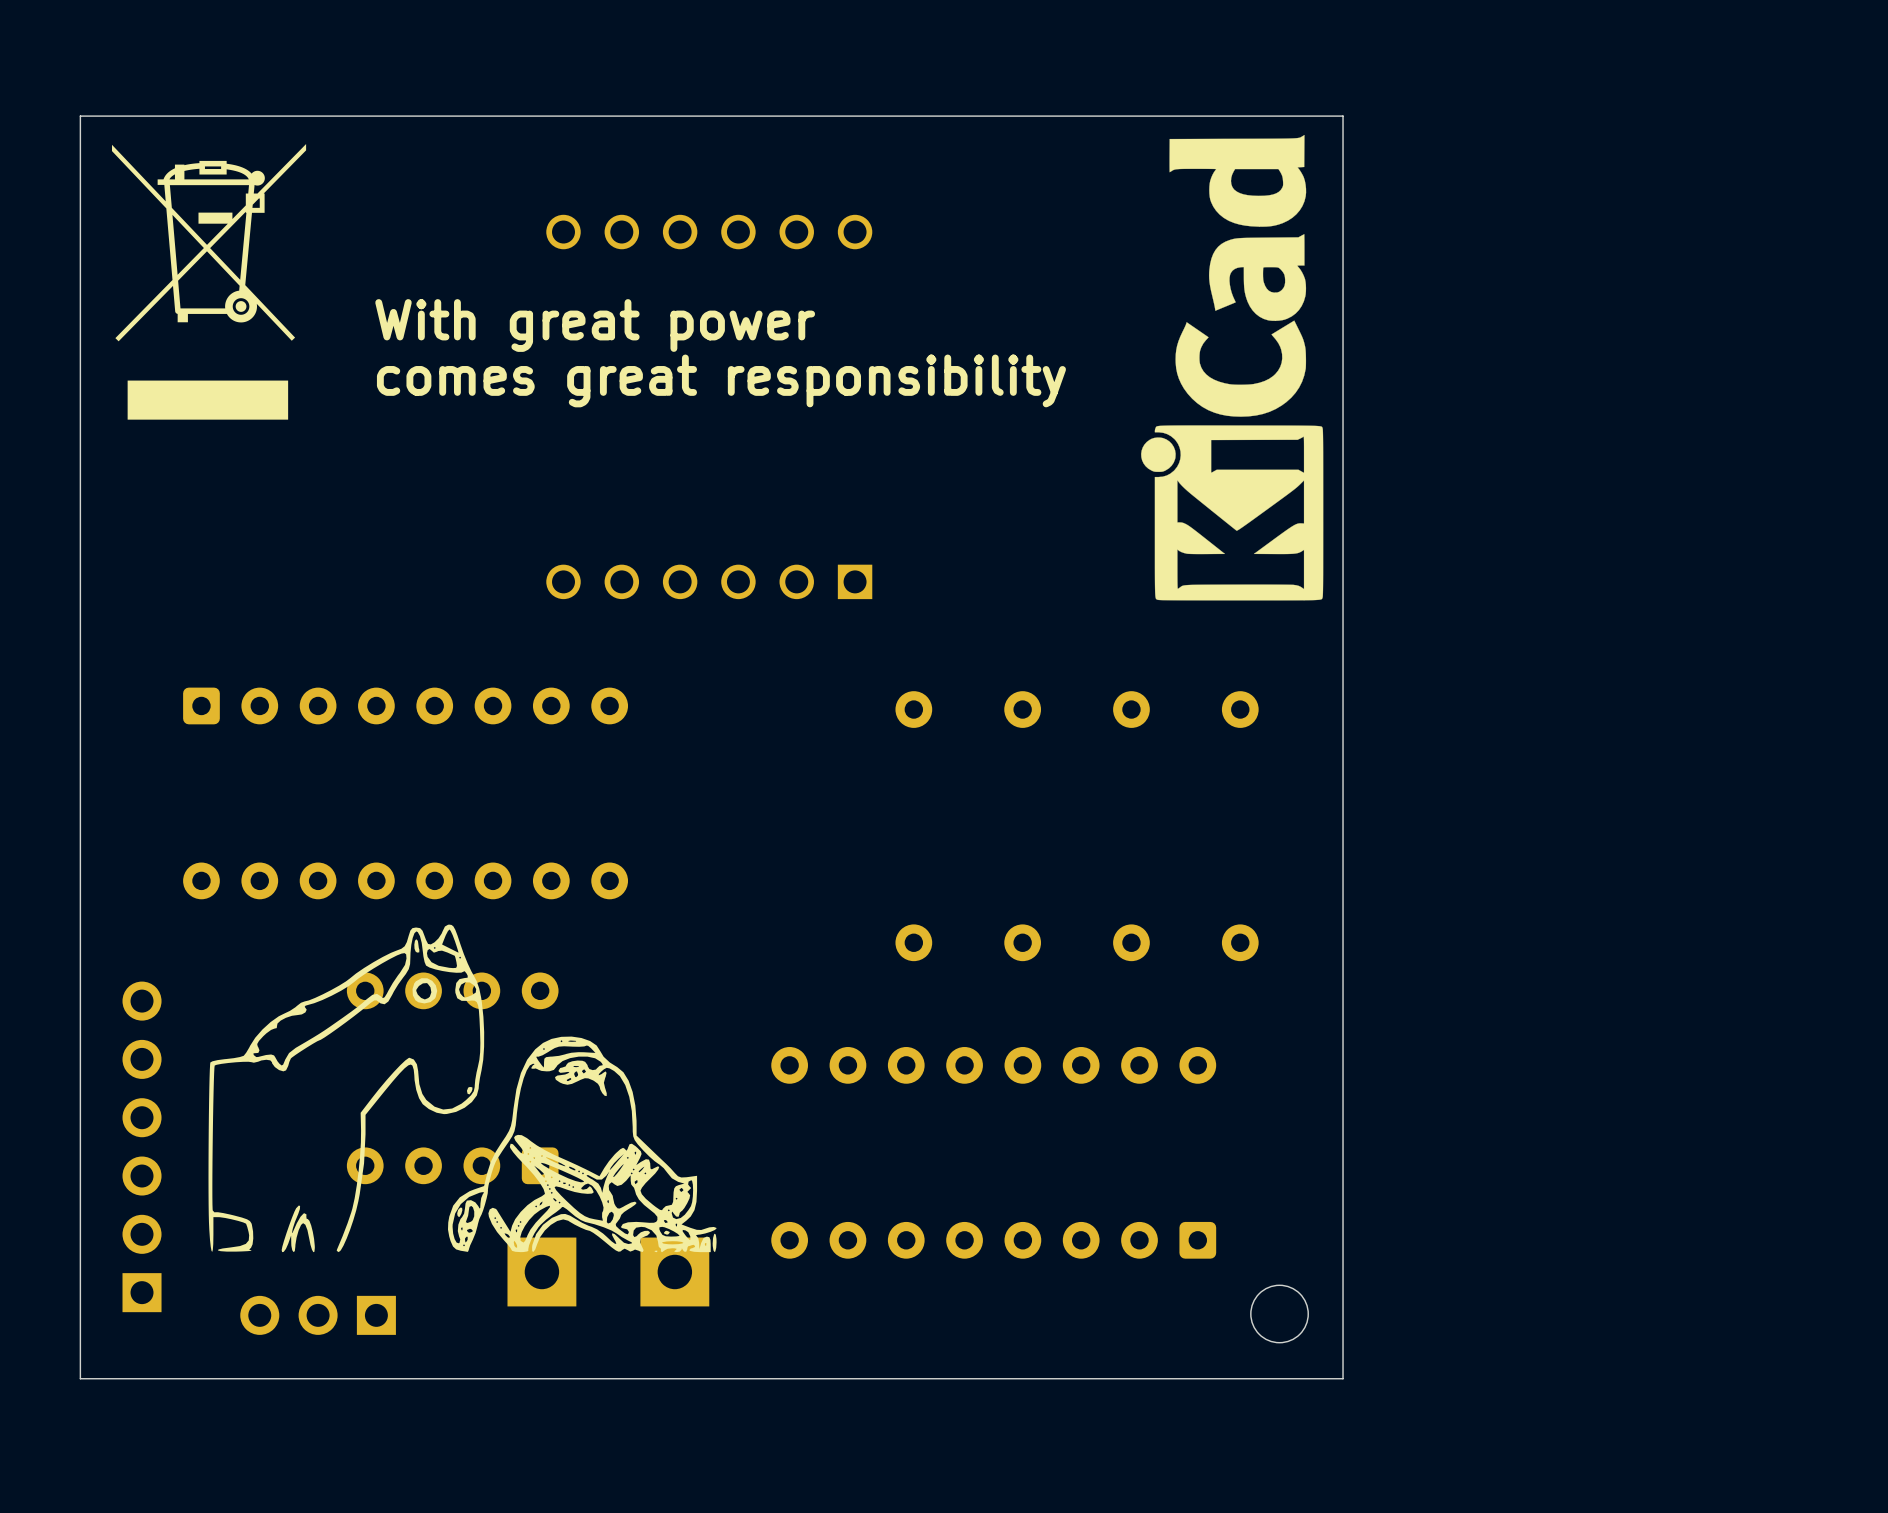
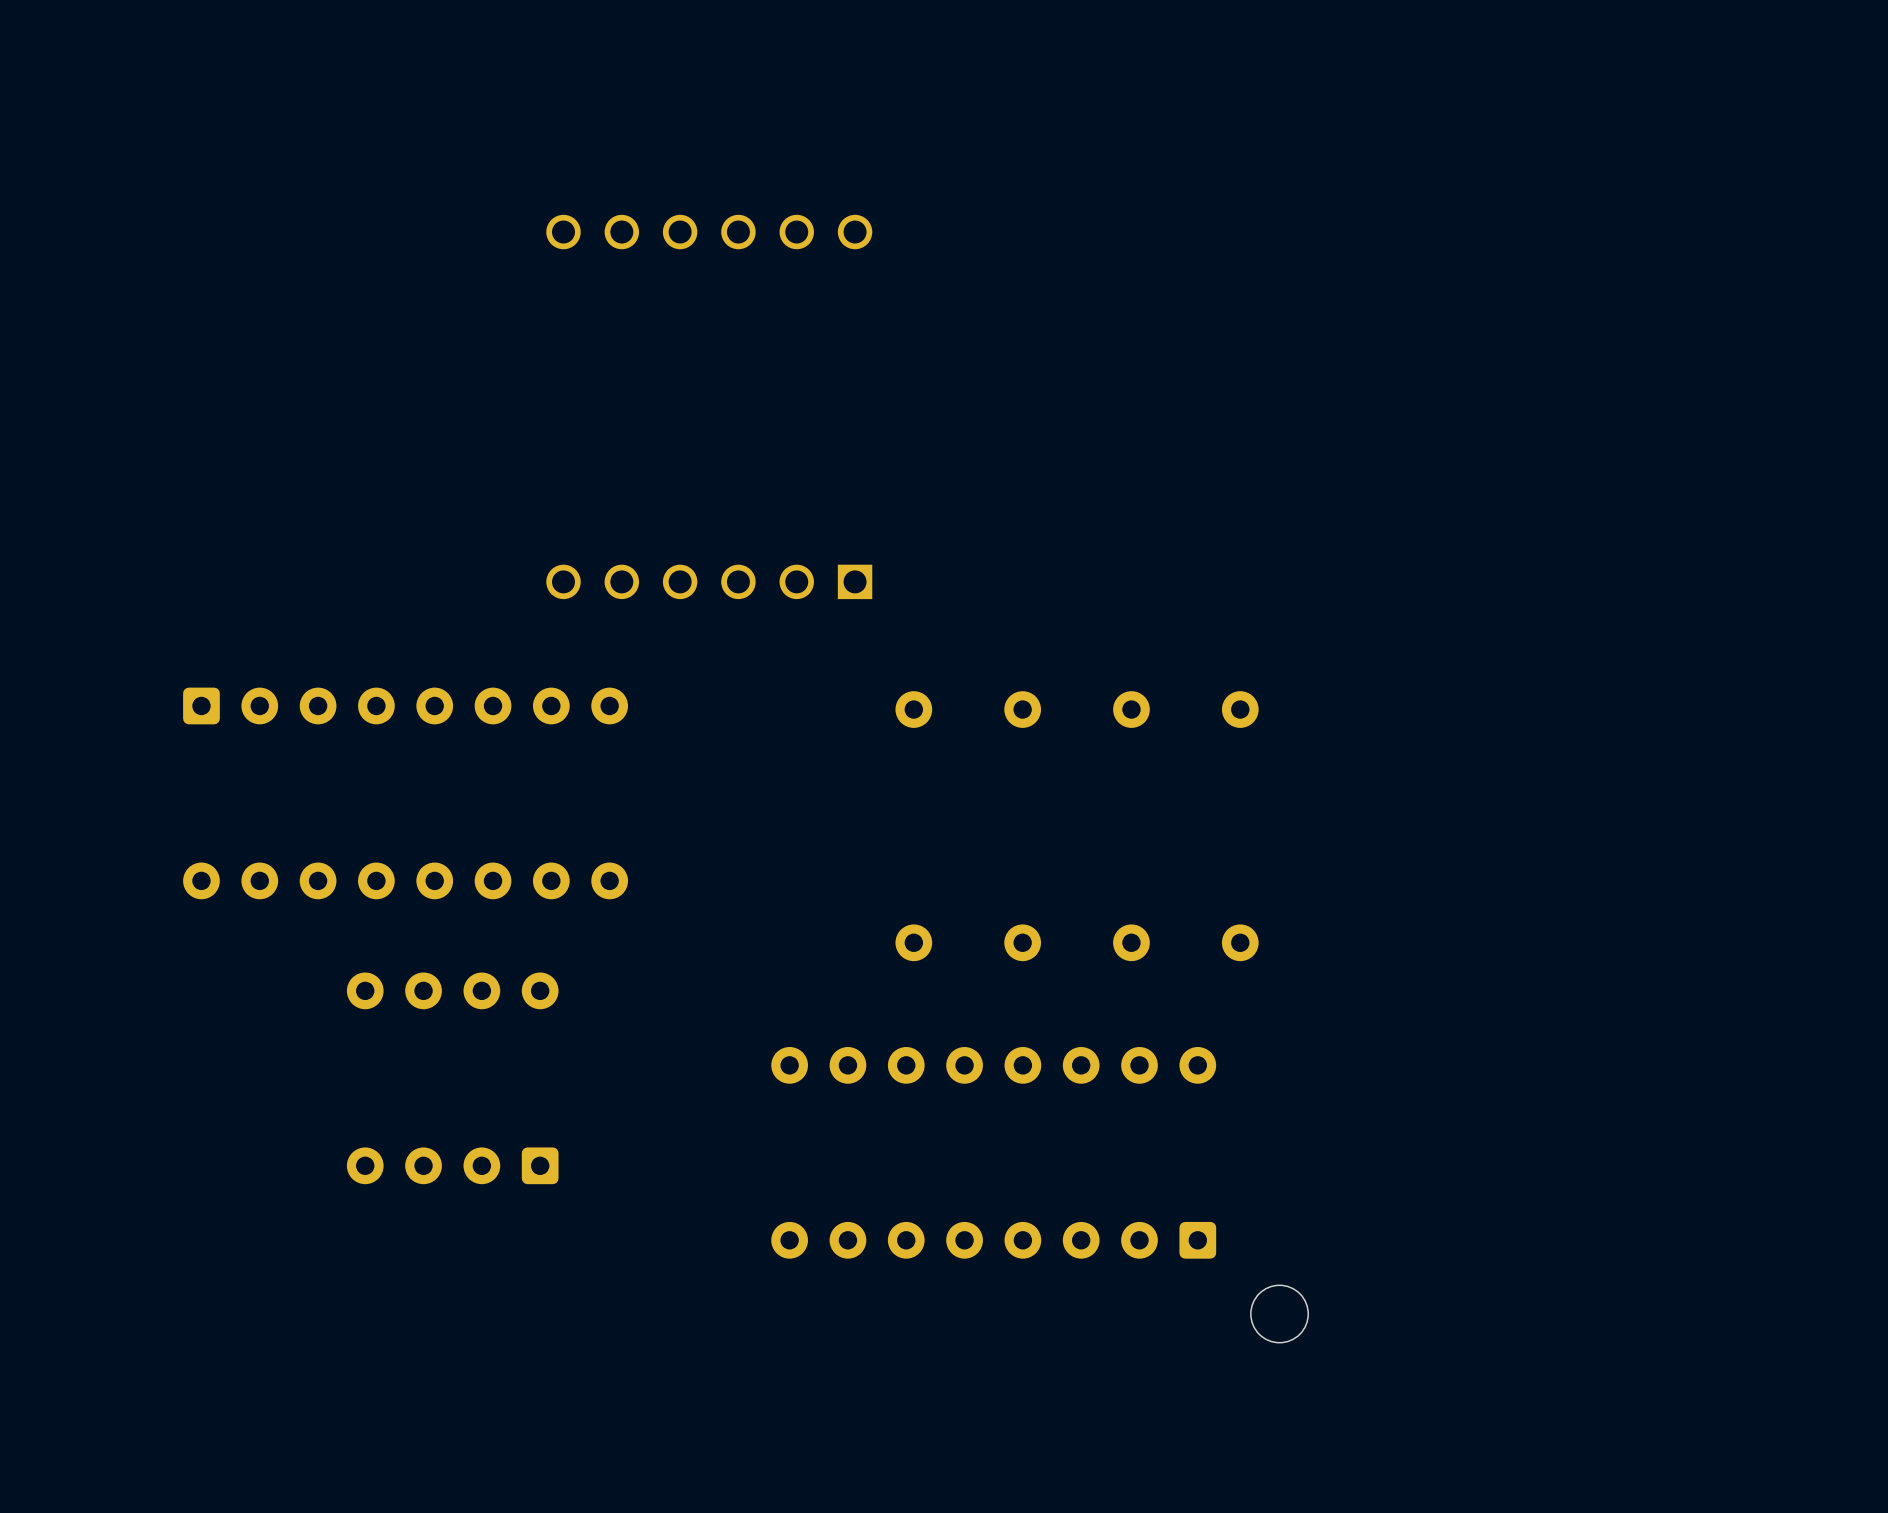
board edge: (1343, 116) (80, 116) (80, 1378) (1343, 1378) (1343, 116) -> none
drawing: [1141, 134, 1324, 601] -> none
drawing: [111, 144, 307, 420] -> none
text: With great power (595, 325) -> none
text: comes great responsibility (721, 380) -> none
drawing: [208, 924, 717, 1253] -> none
part: (142, 1146) -> none
part: (541, 1271) -> none
part: (674, 1271) -> none
part: (318, 1315) -> none

